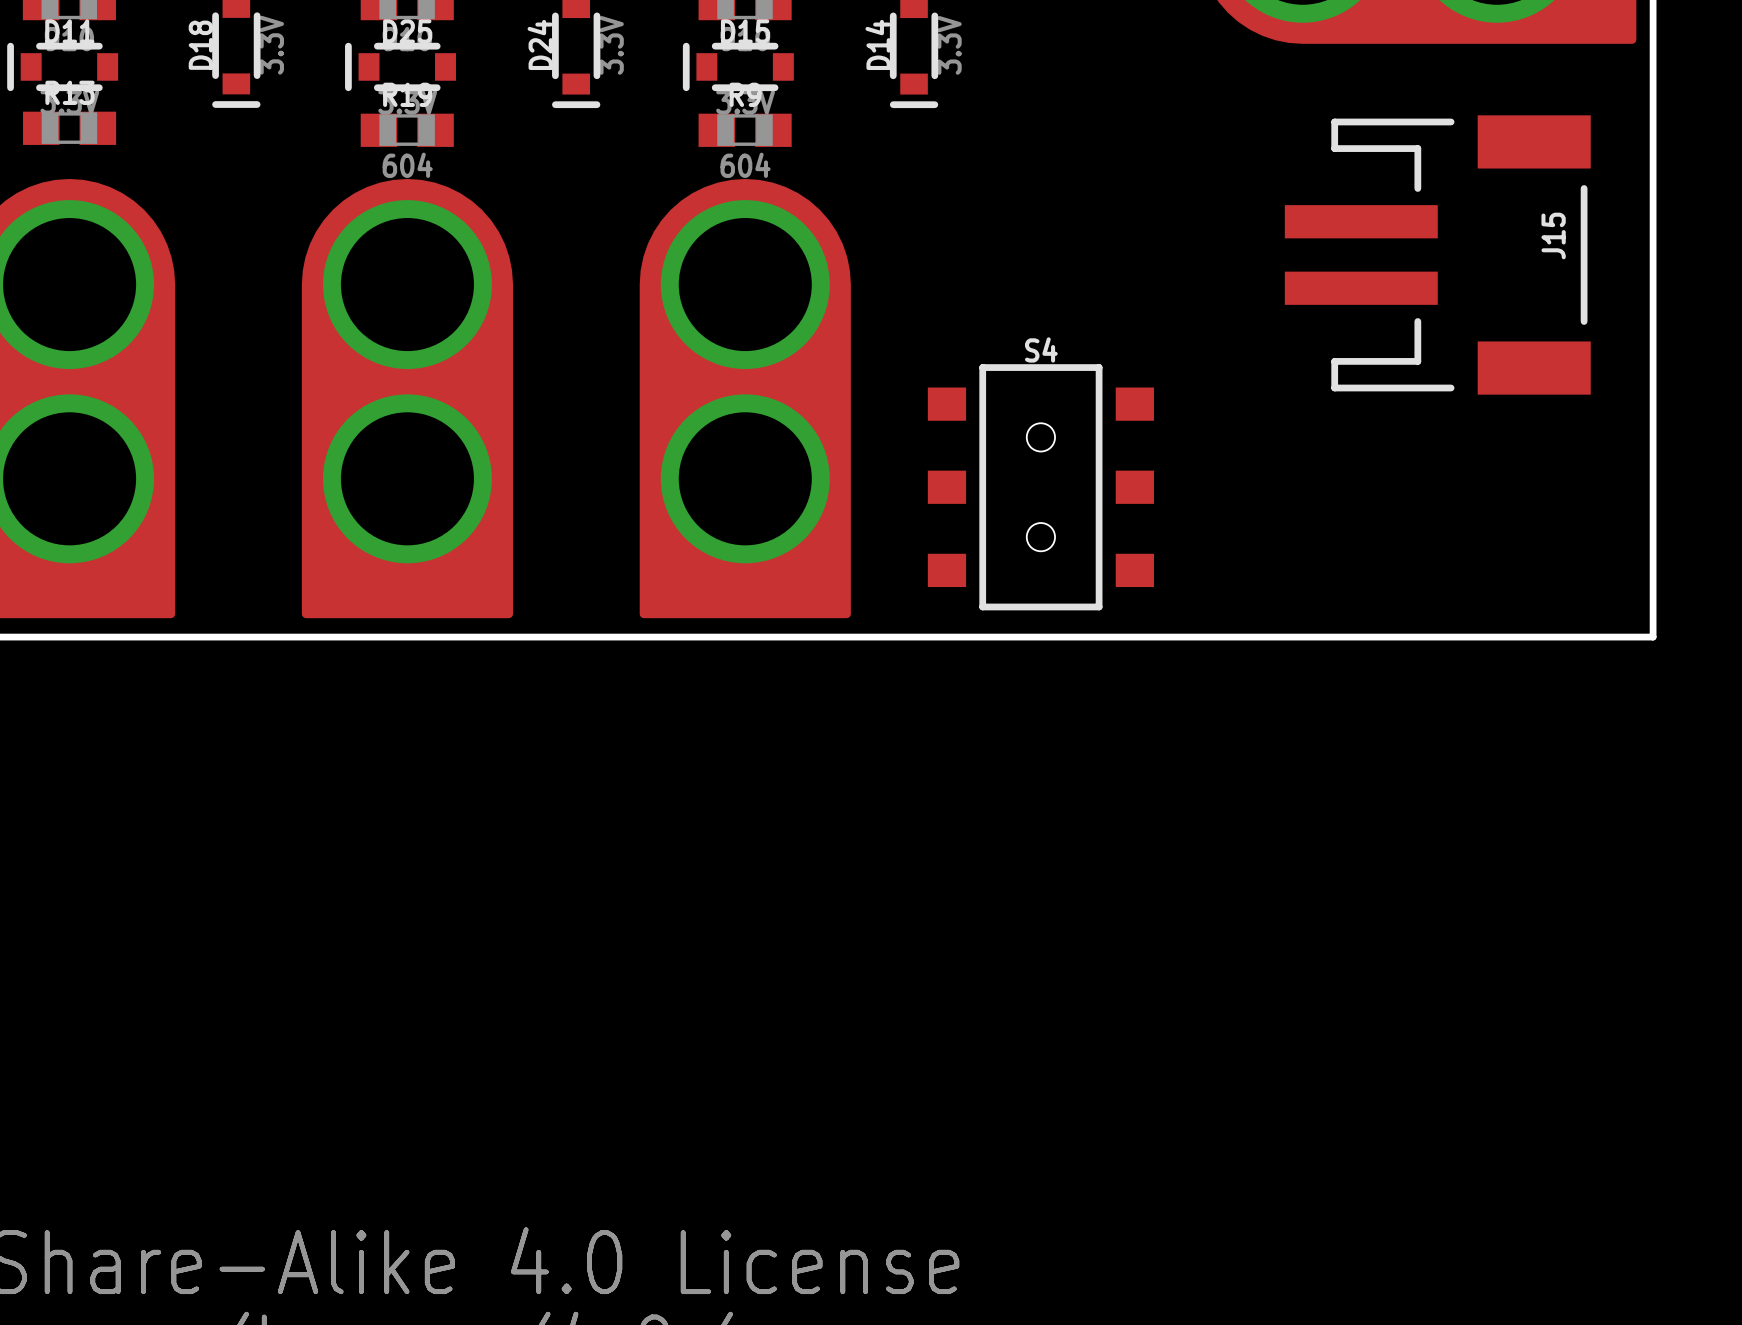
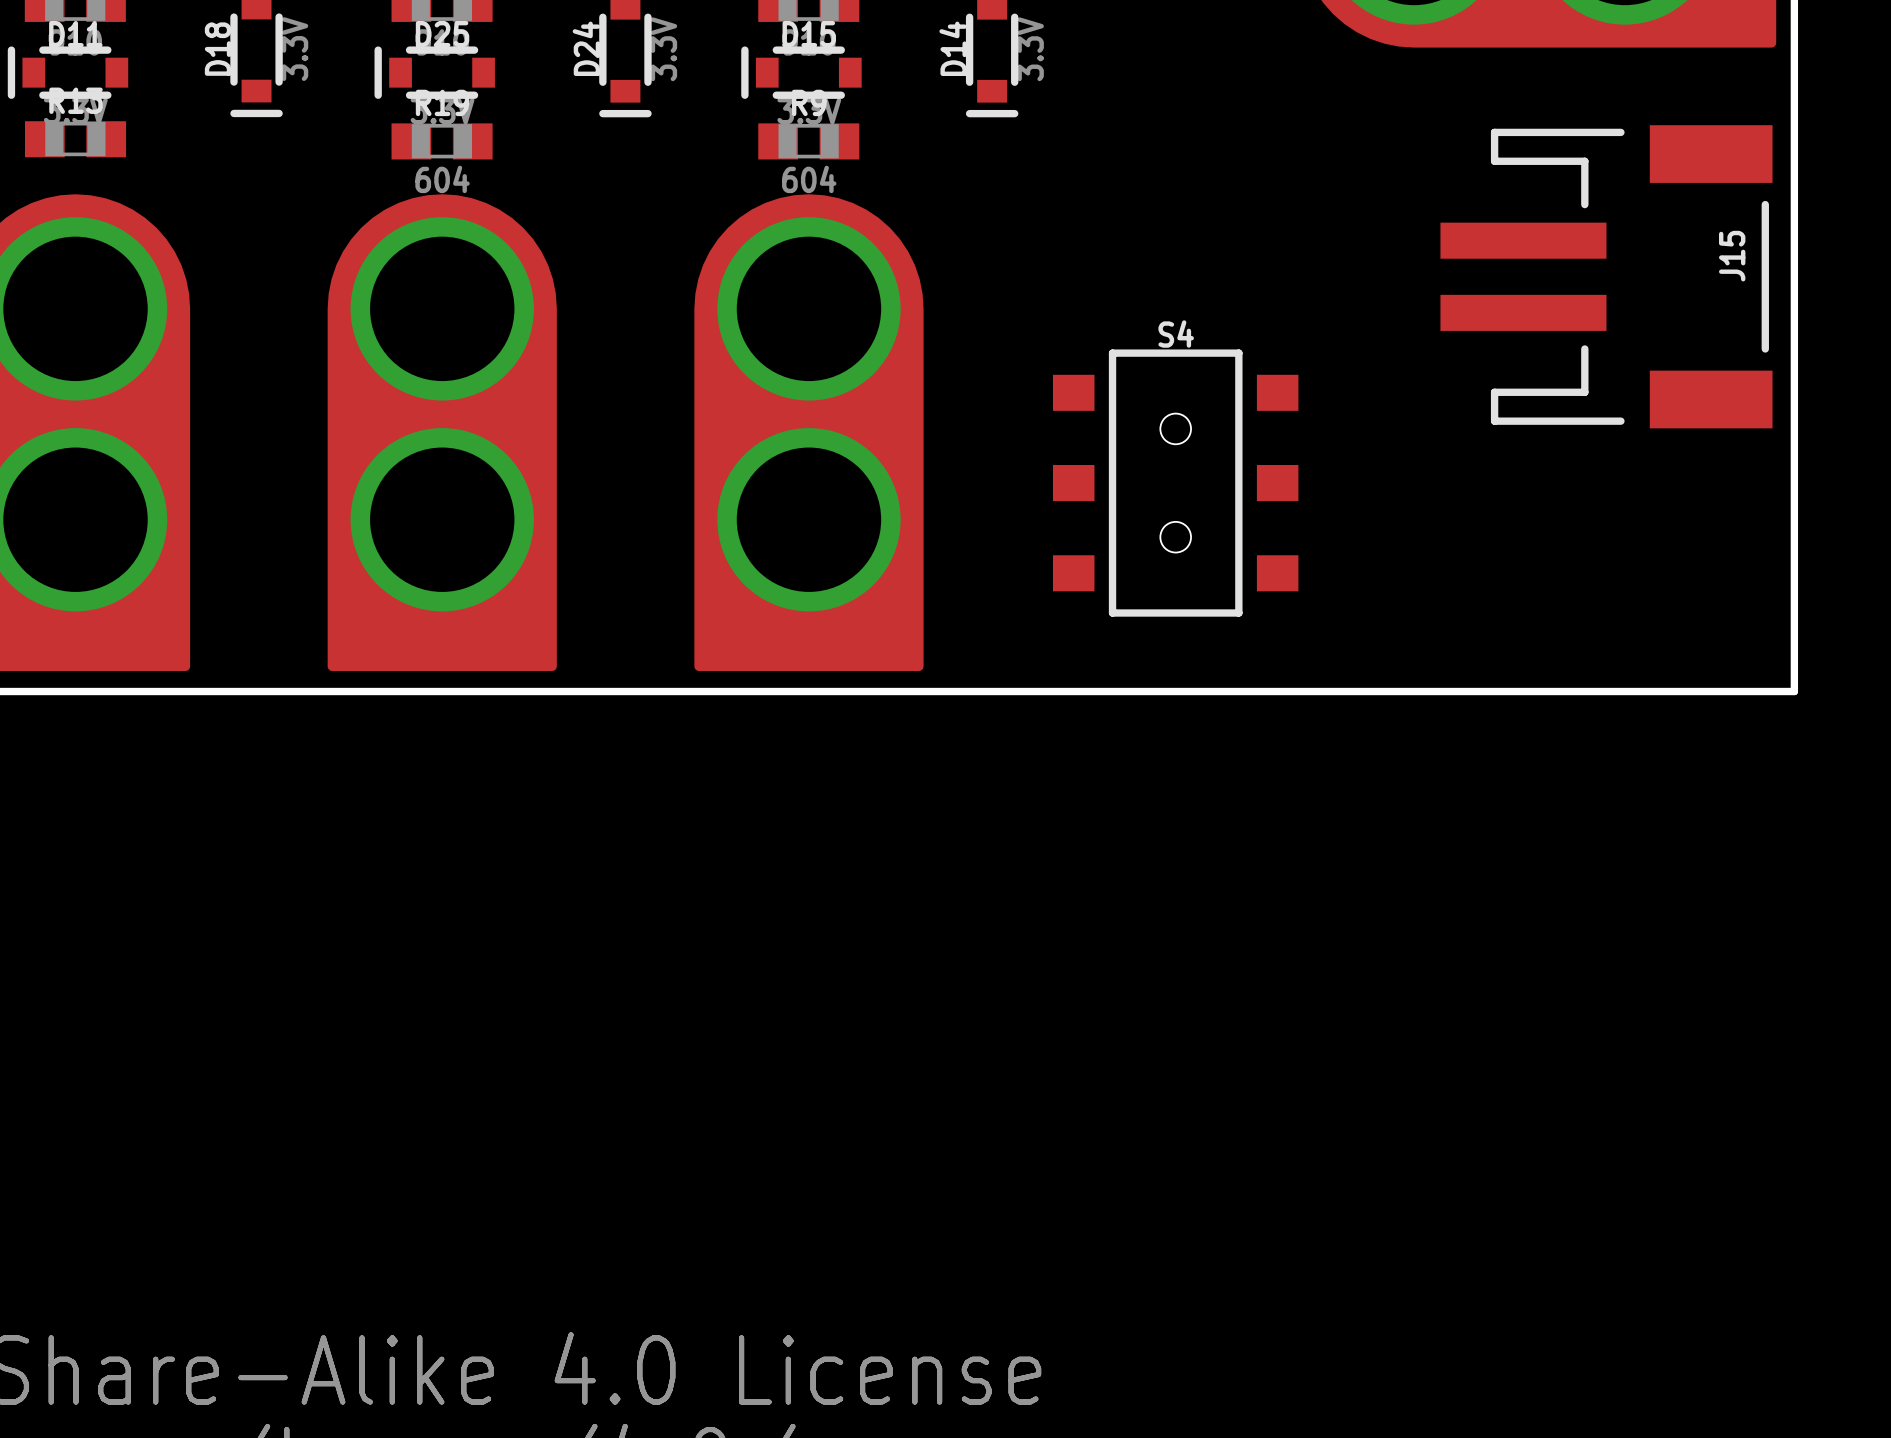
J15 position: (1437, 254) -> (1606, 276)
S4 position: (1040, 487) -> (1175, 483)

